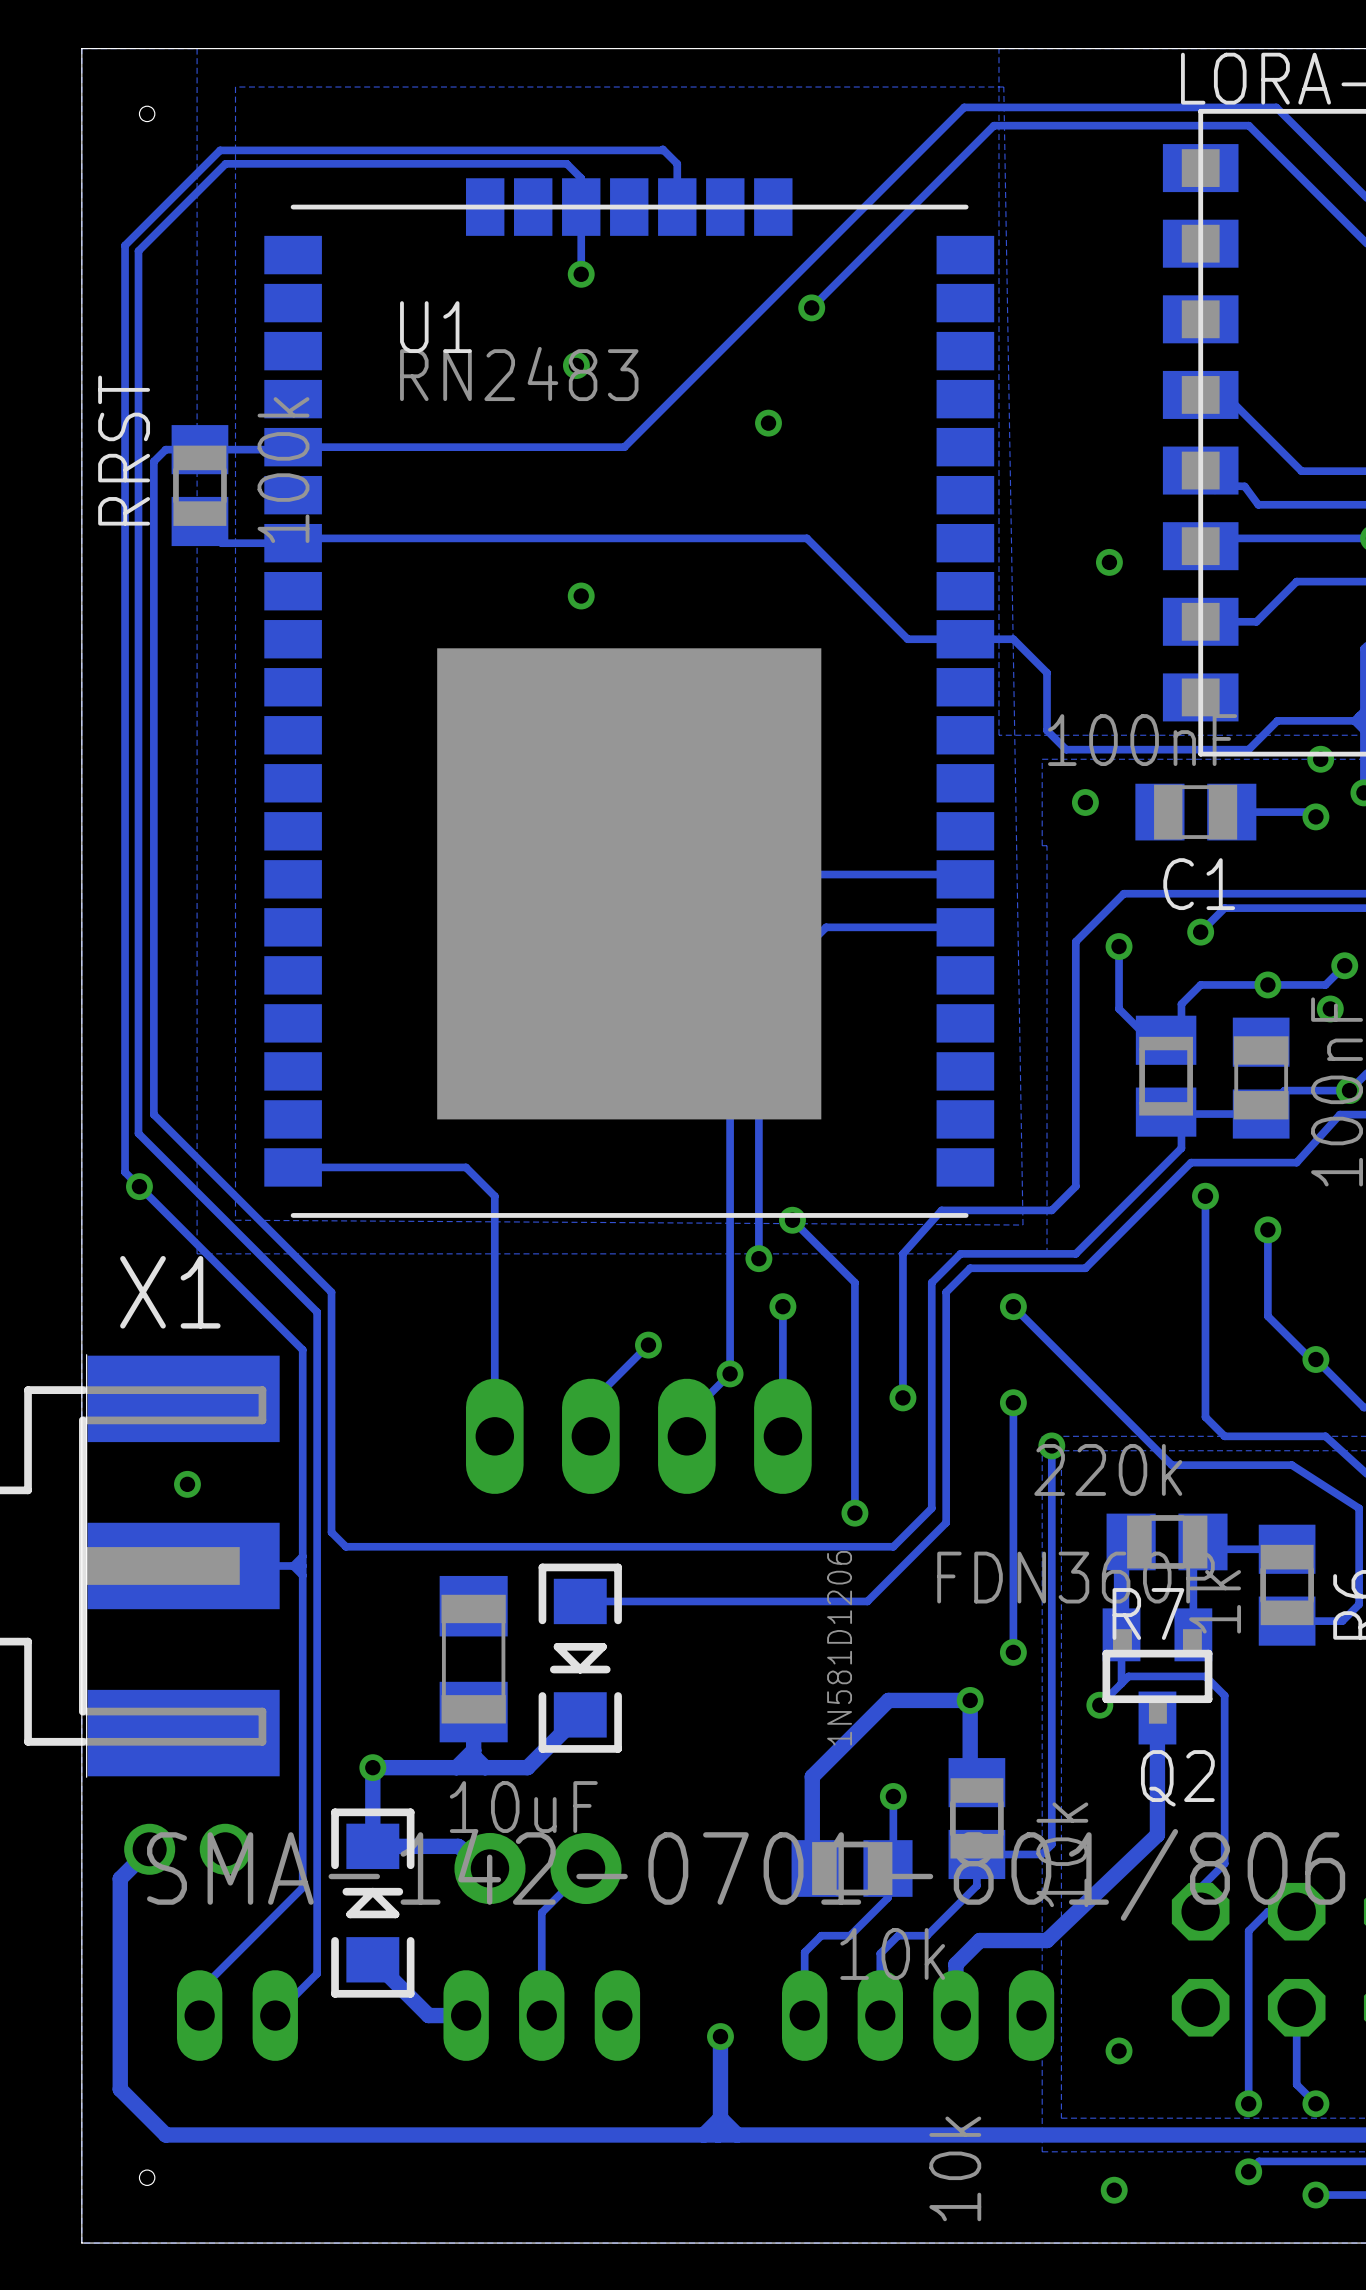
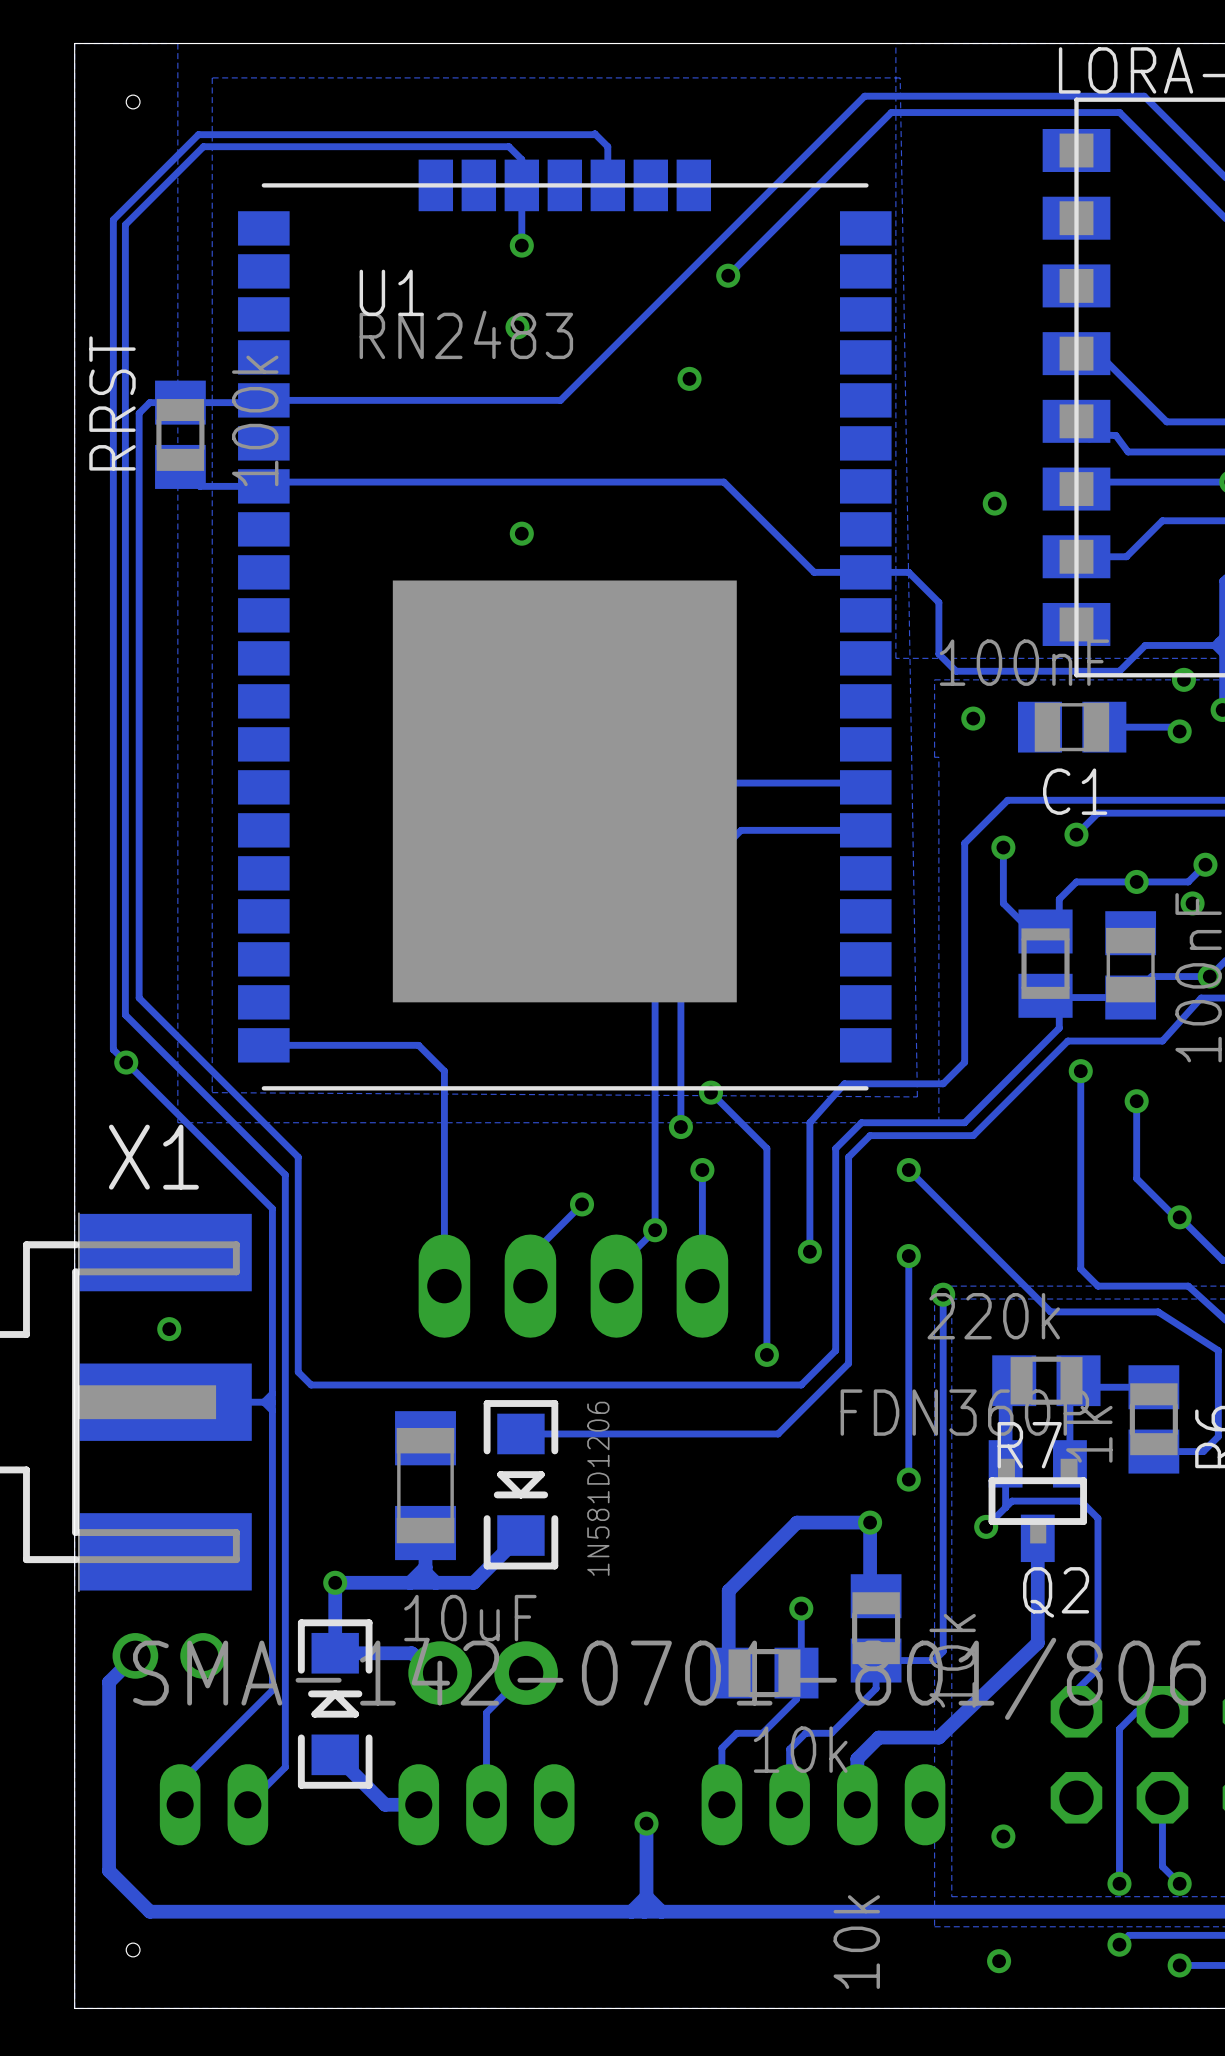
part value position: 1N581D1206 (839, 1648) -> 1N581D1206 (598, 1488)

